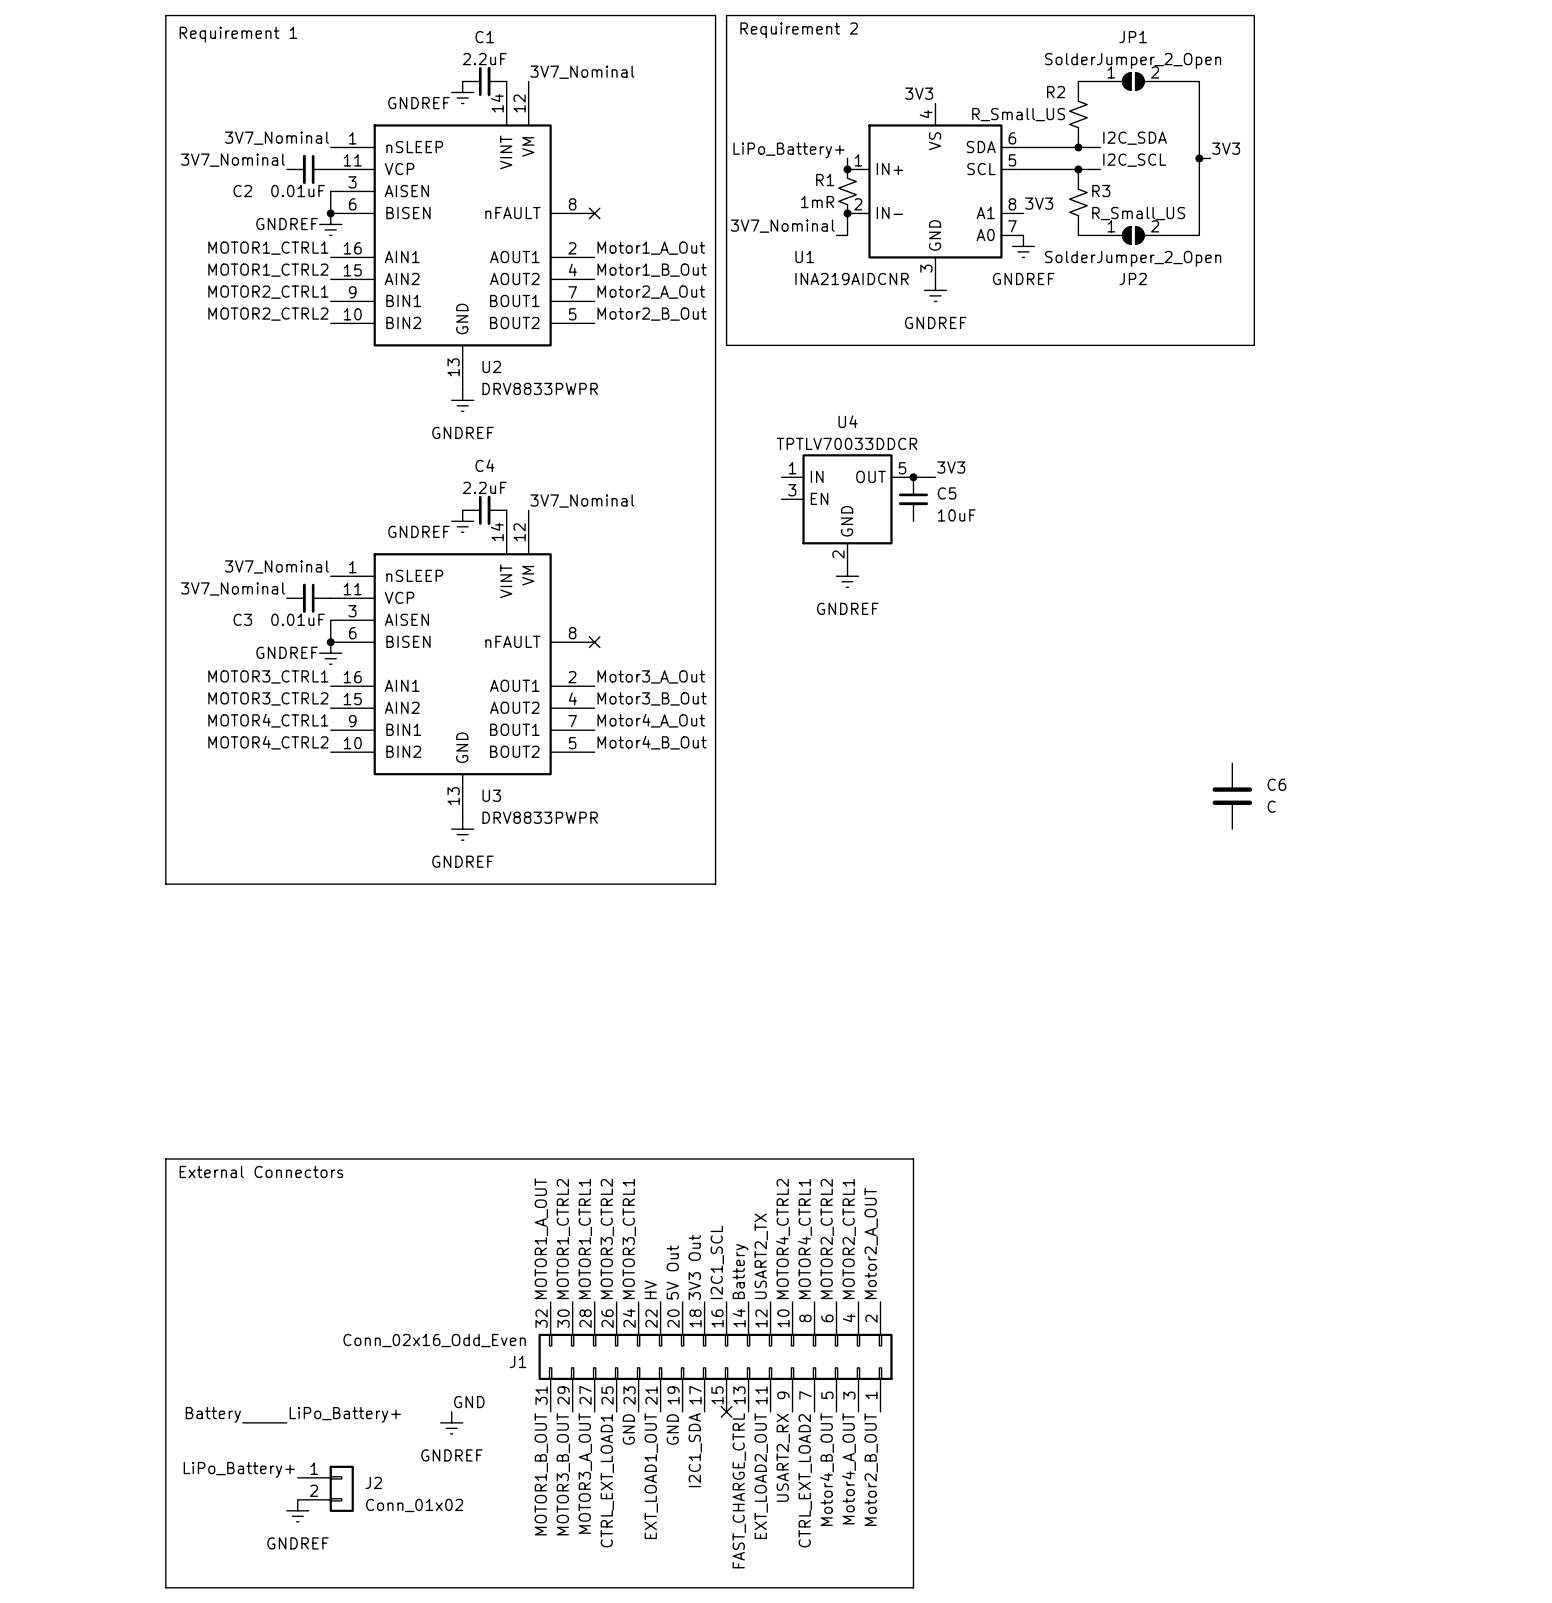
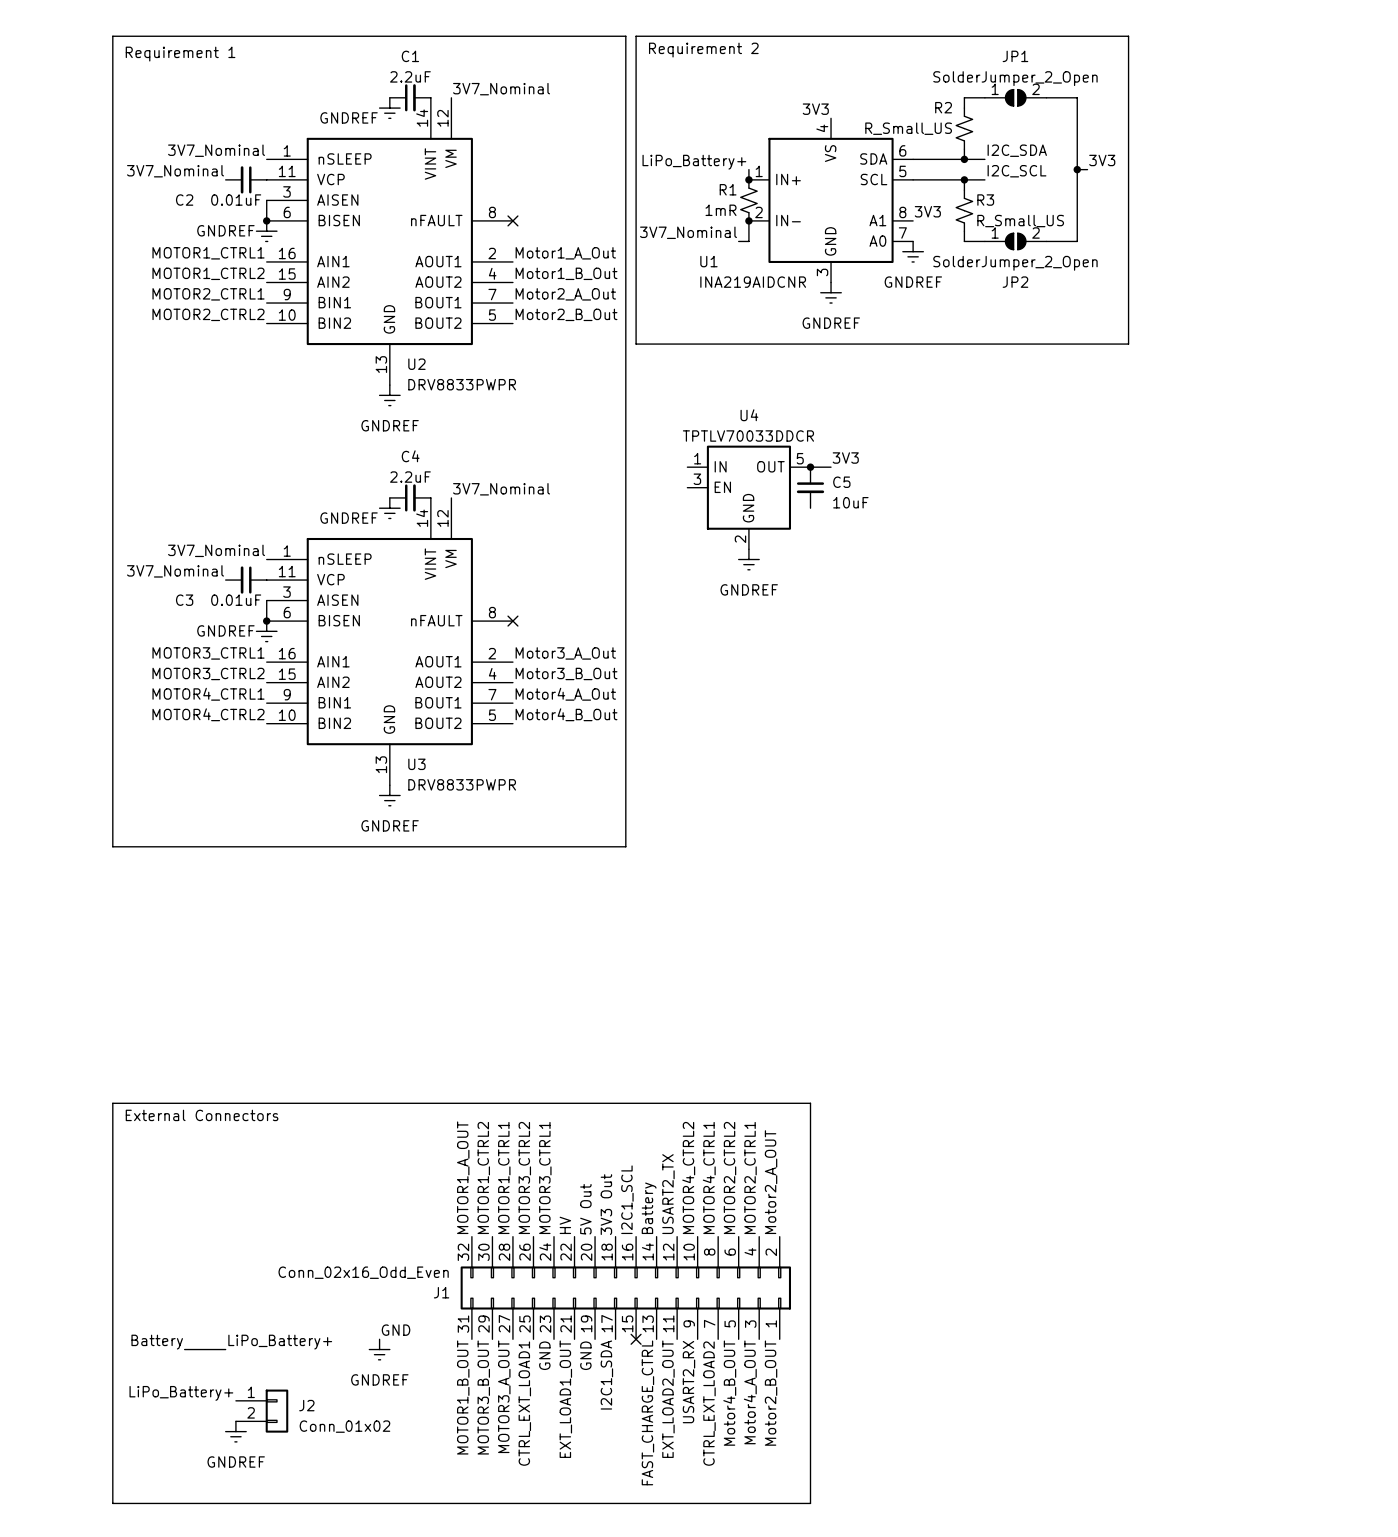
C6: C (1232, 796) -> none

